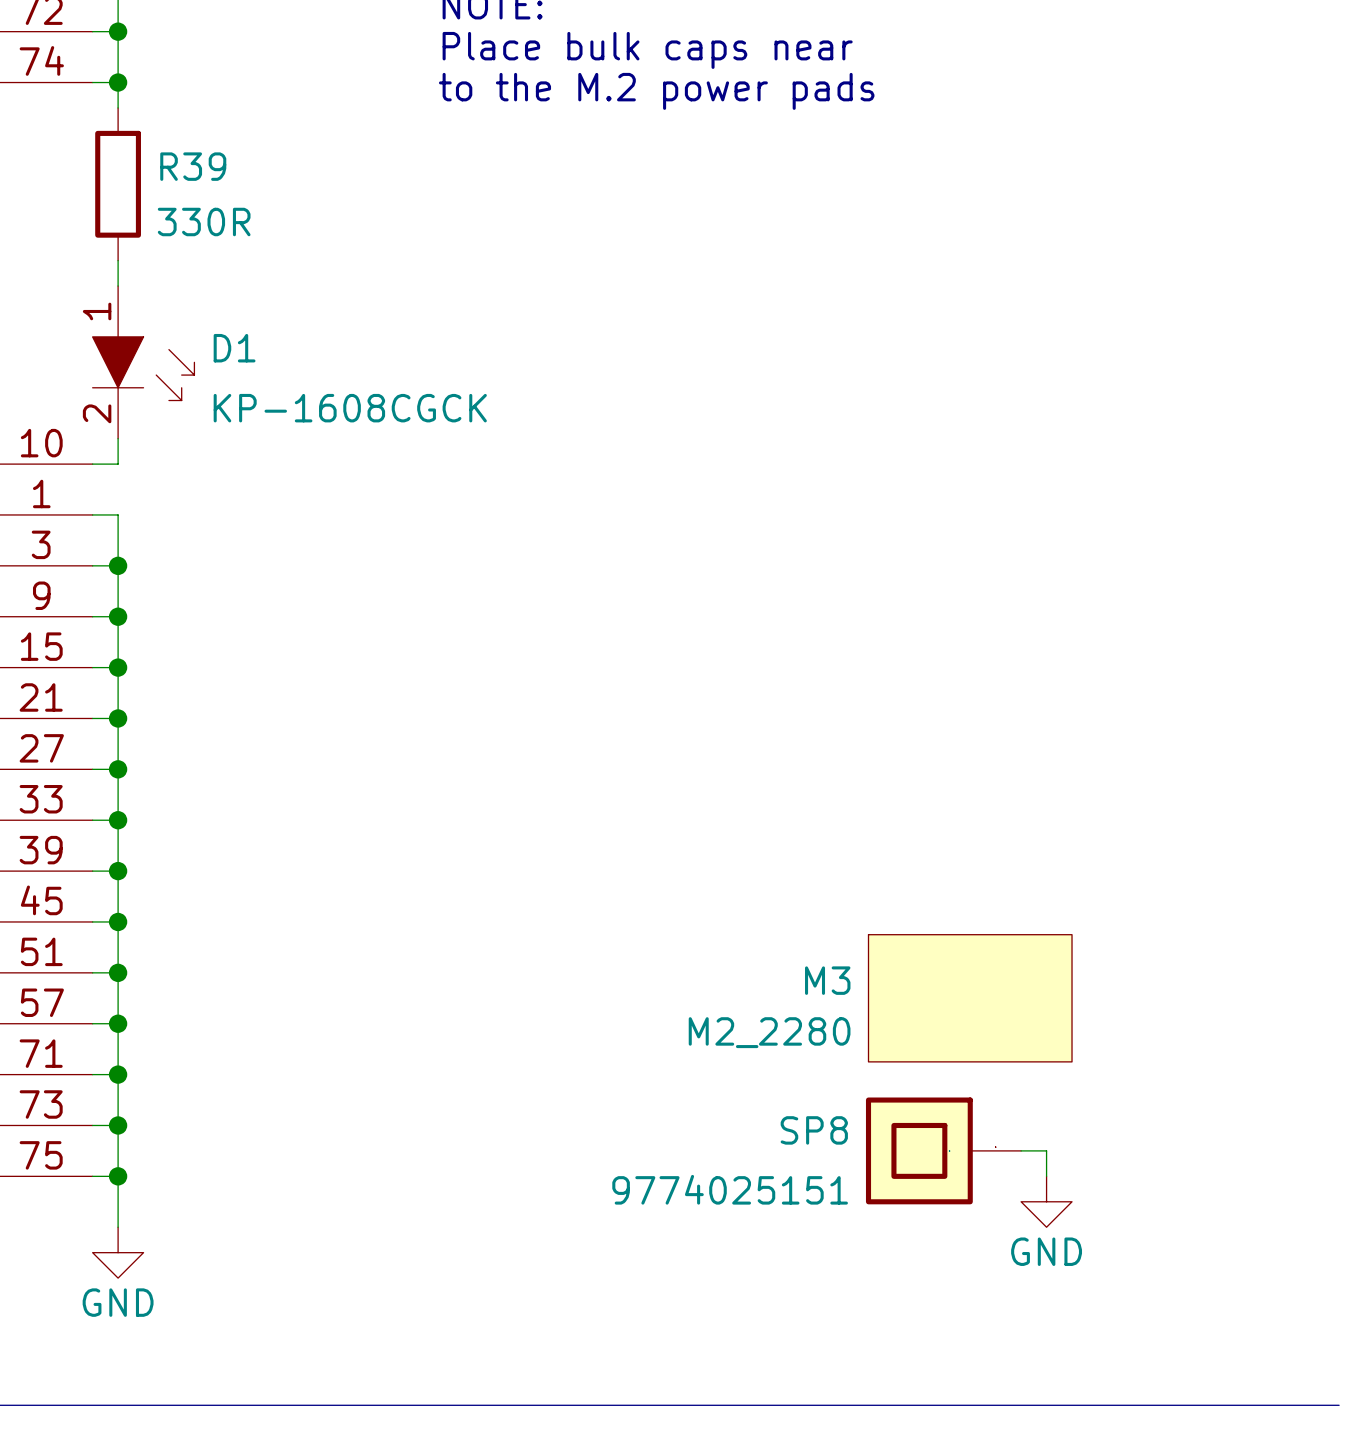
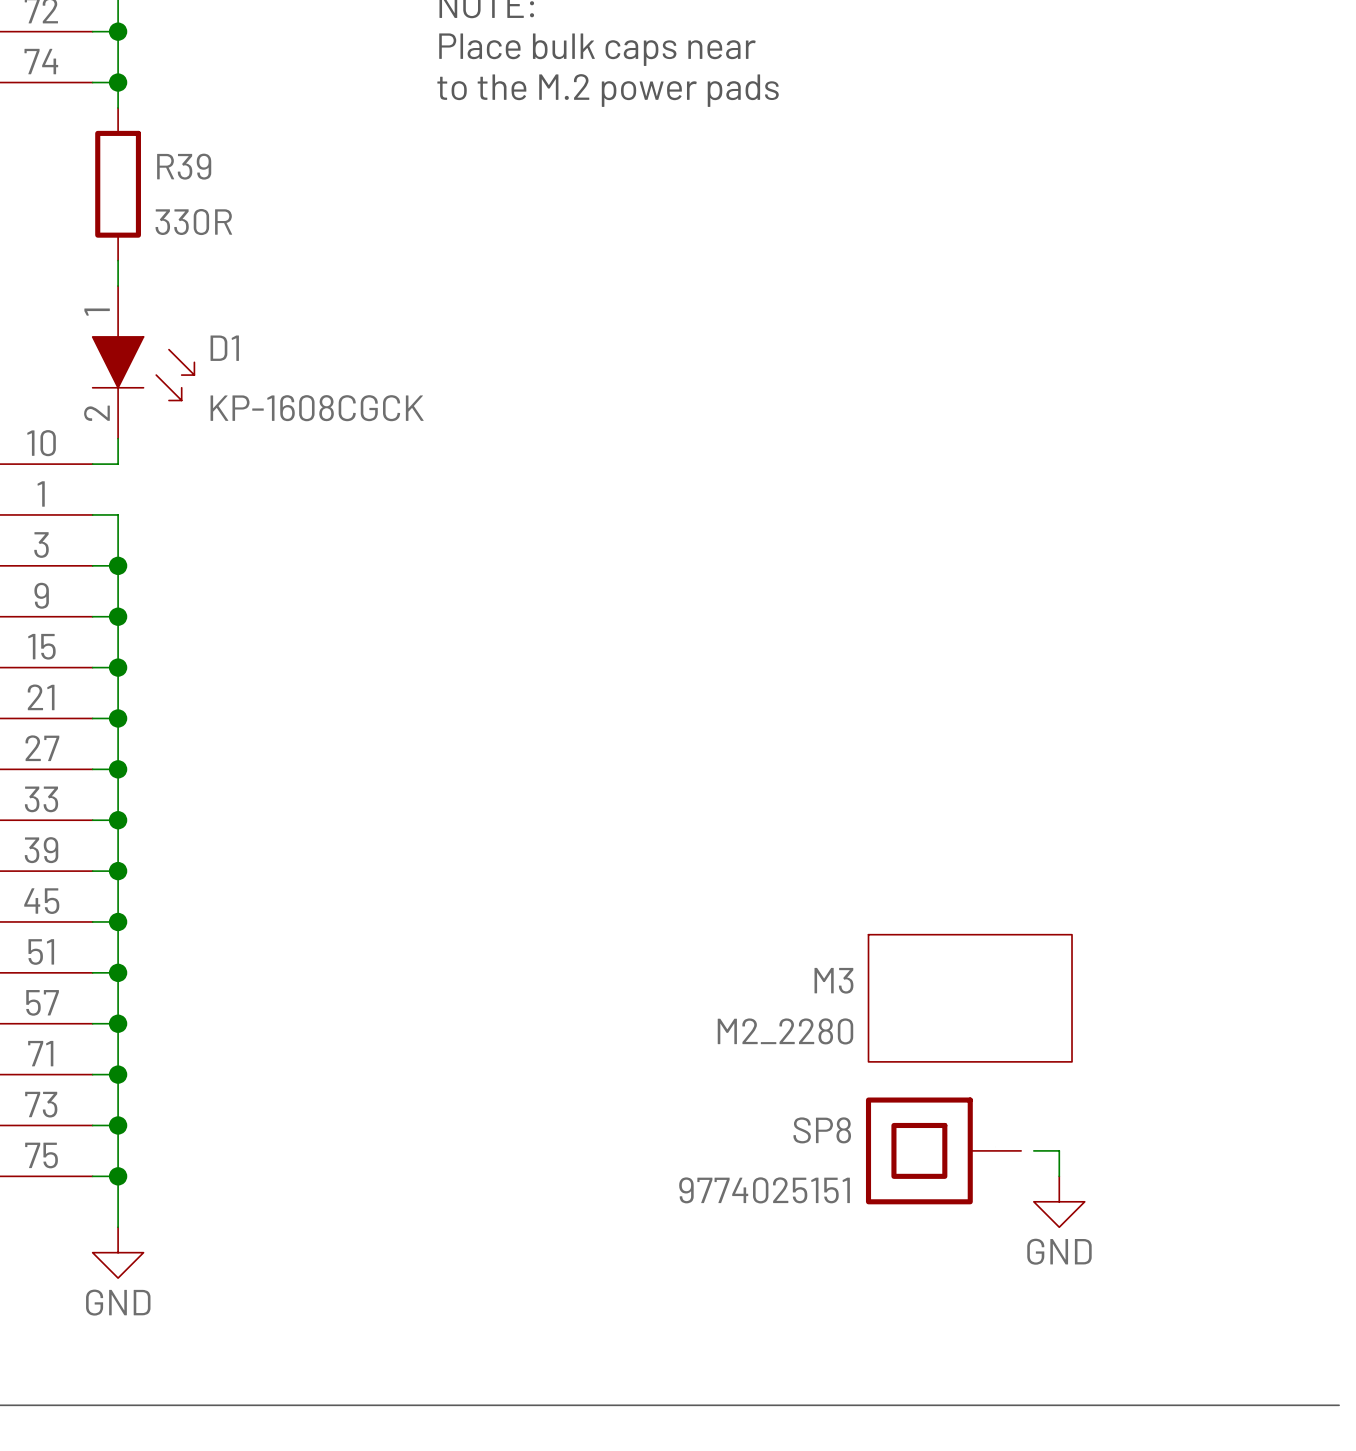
wire: (1021, 1150) (1033, 1150) -> none
wire: (1046, 1150) (1046, 1176) -> (1046, 1150) (1059, 1150) (1059, 1176)
power symbol position: GND (1046, 1201) -> GND (1059, 1201)

